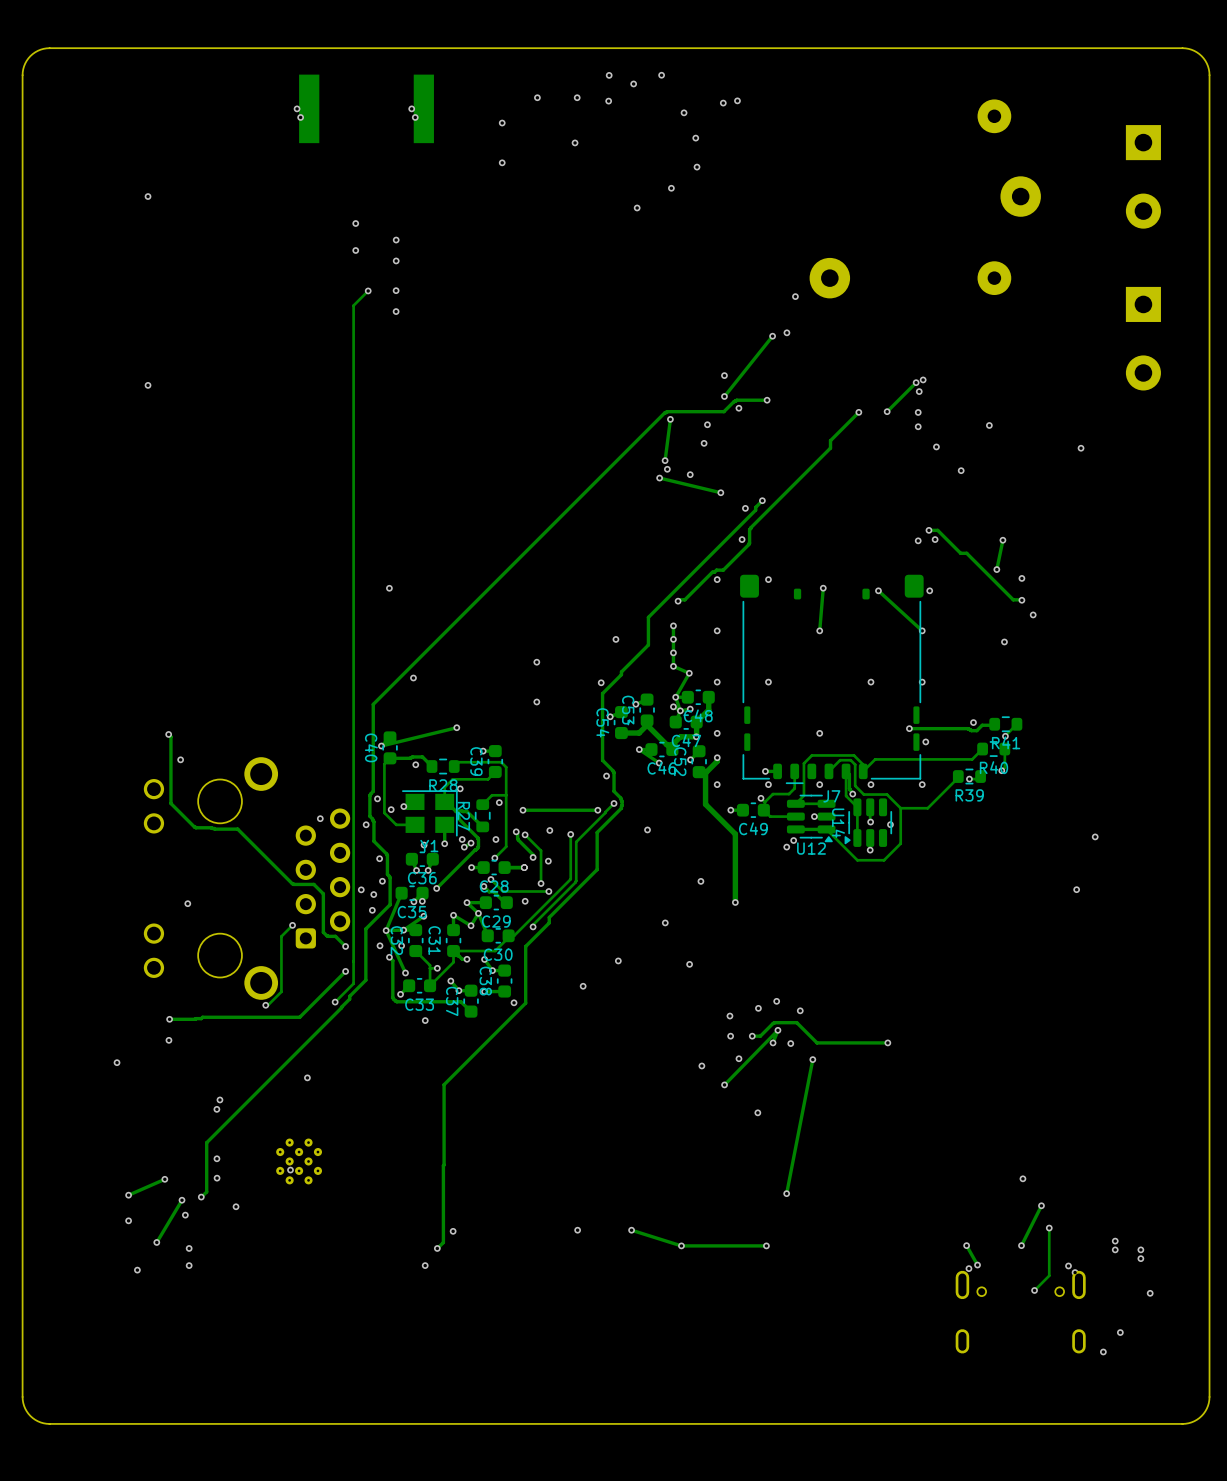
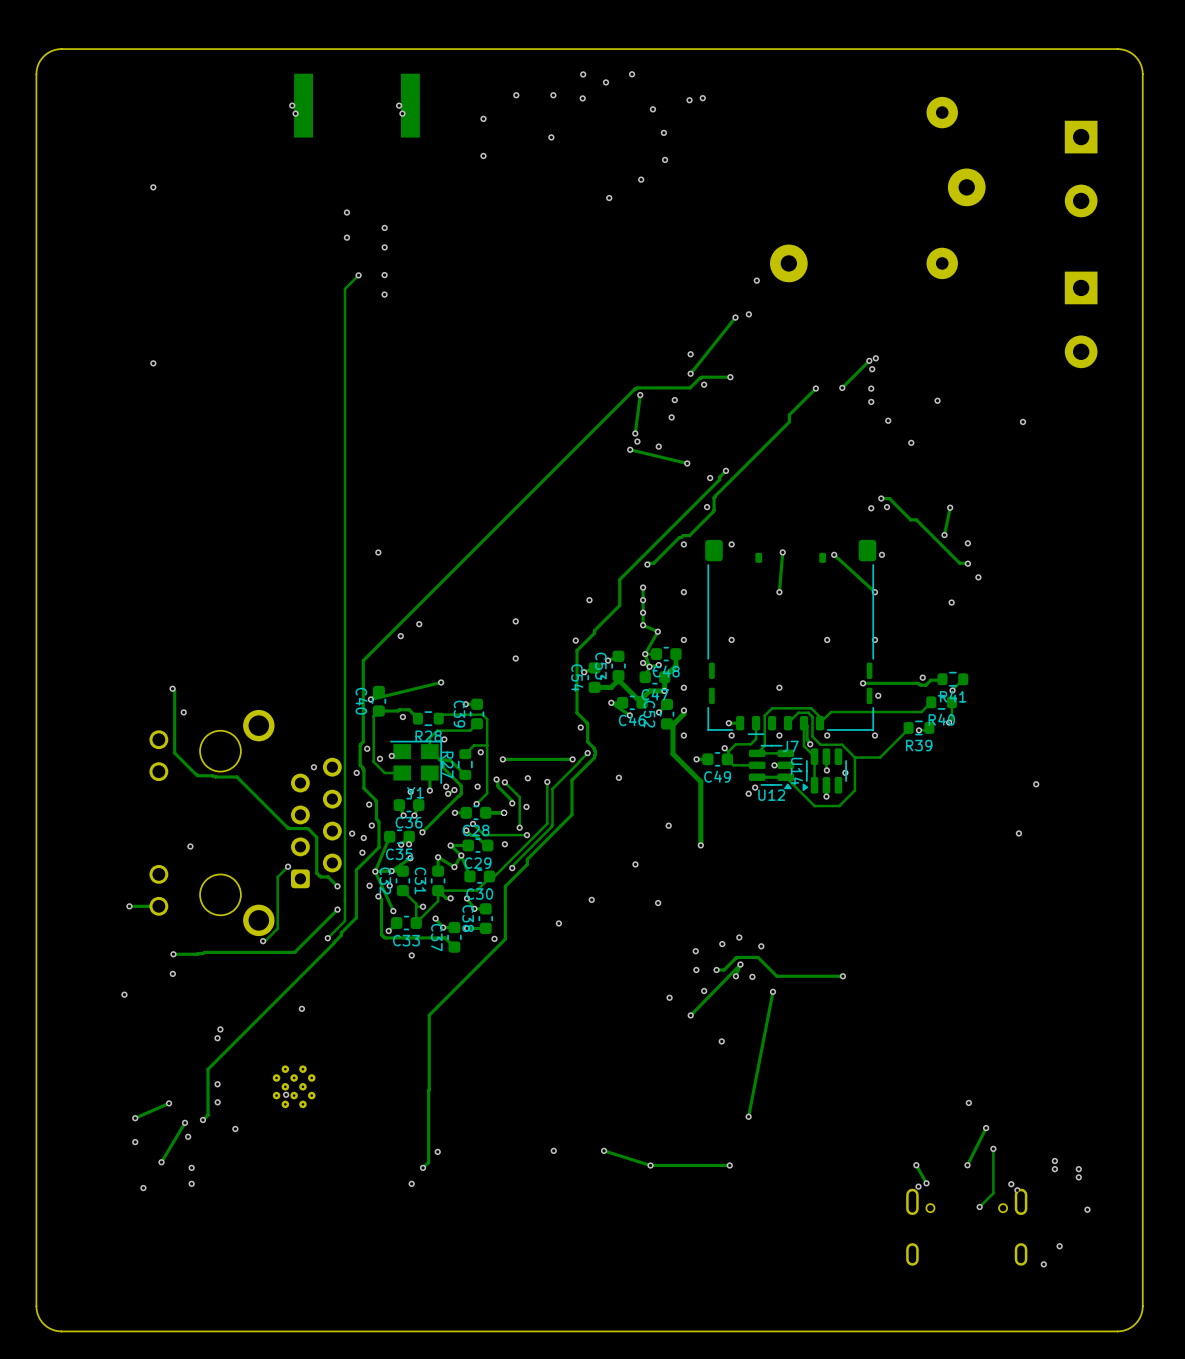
via: none -> (419, 624)
via: none -> (129, 906)
track: none -> (158, 906) (129, 906)

